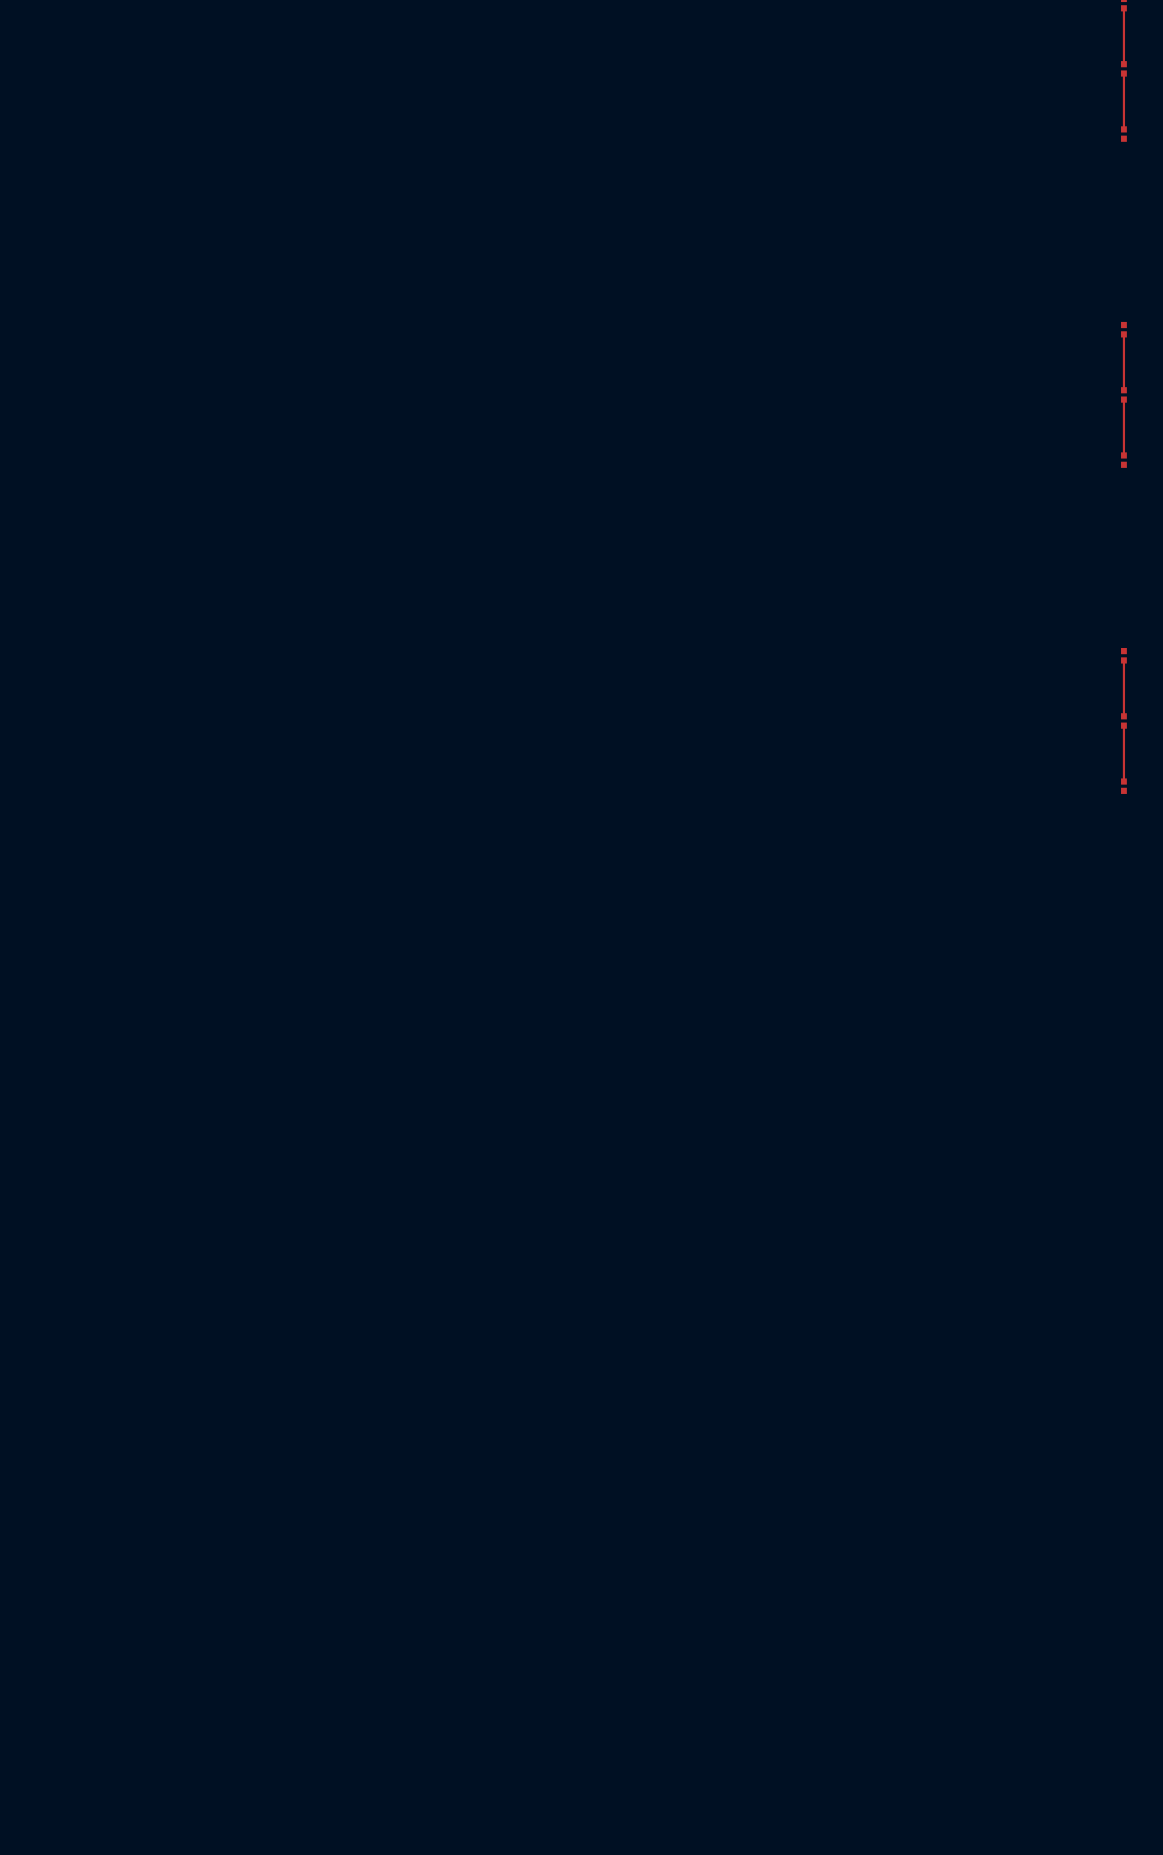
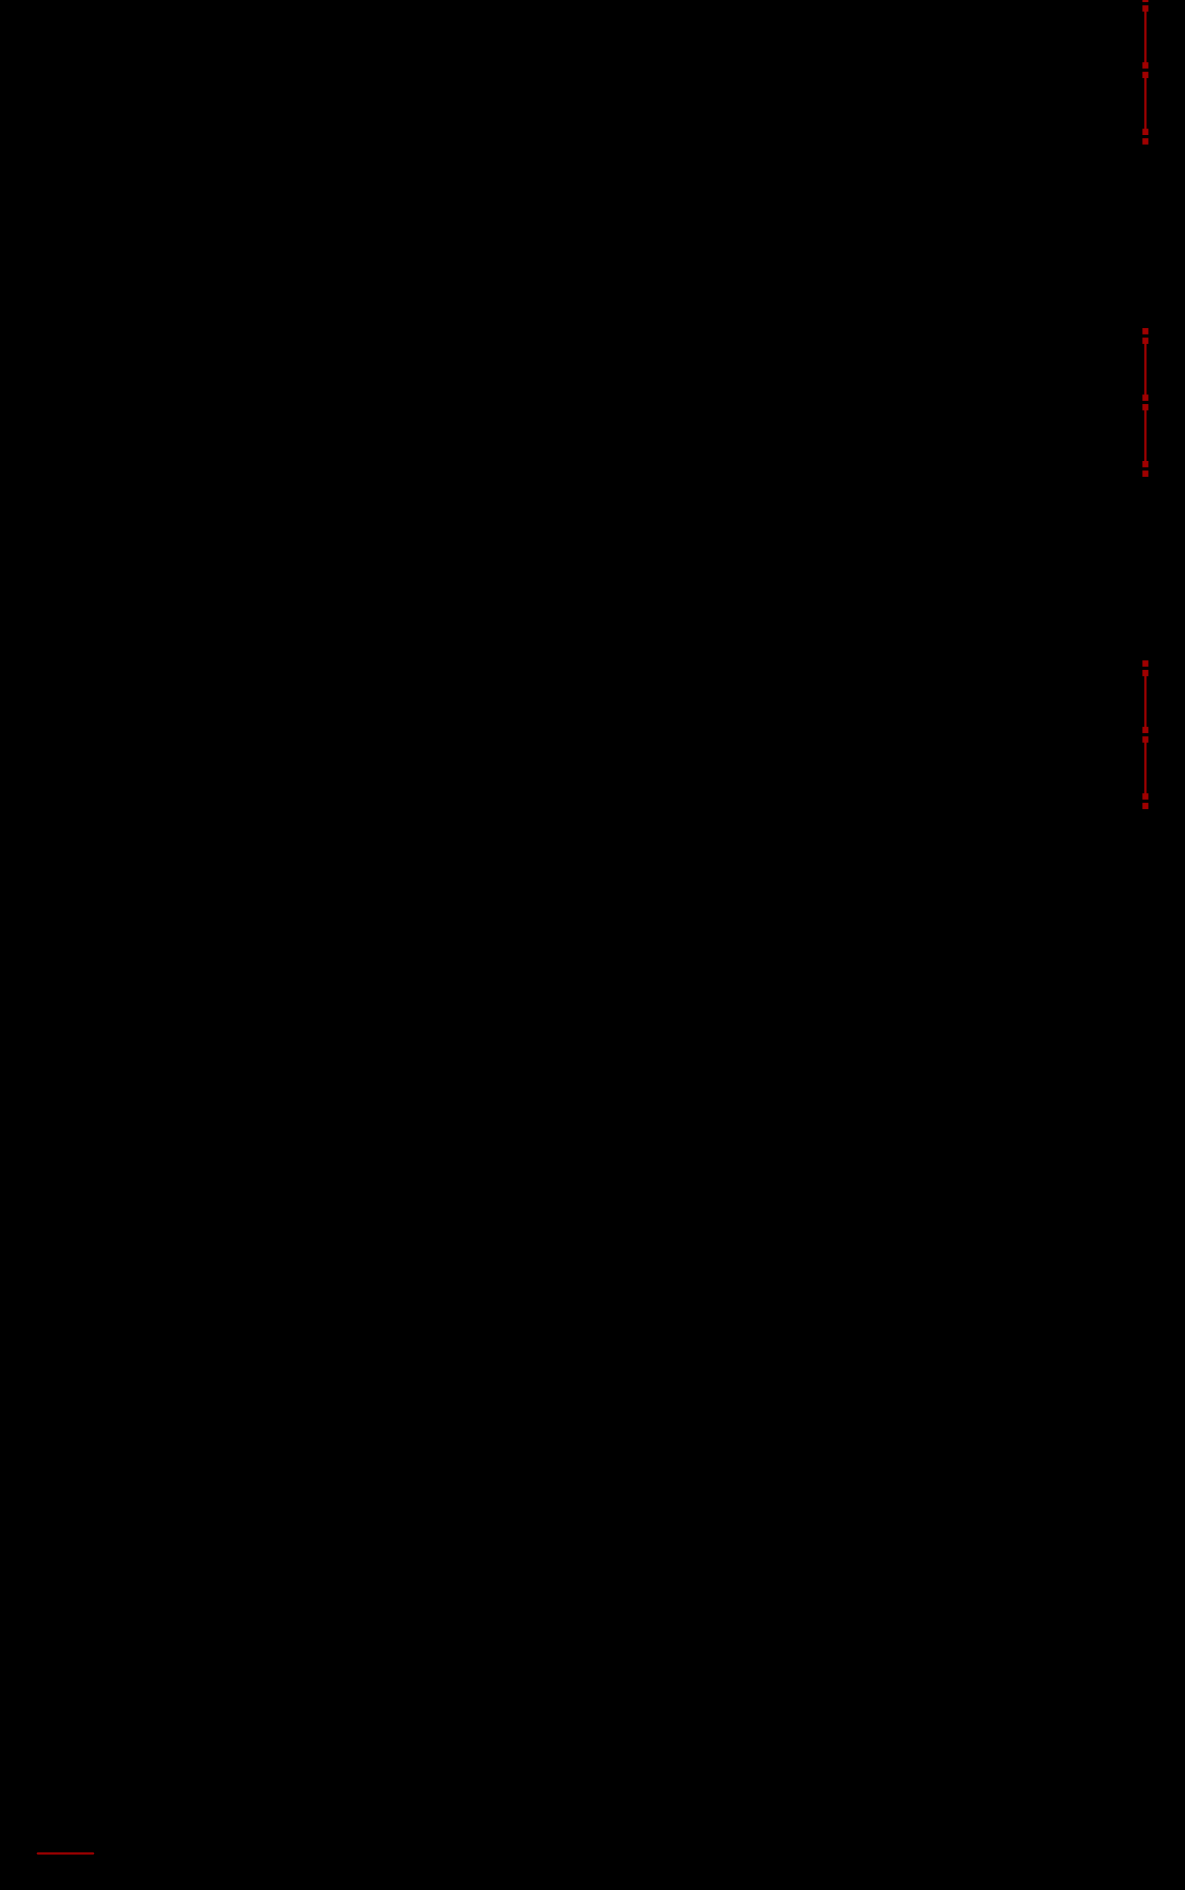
top track: none -> (93, 1853) (37, 1853)

